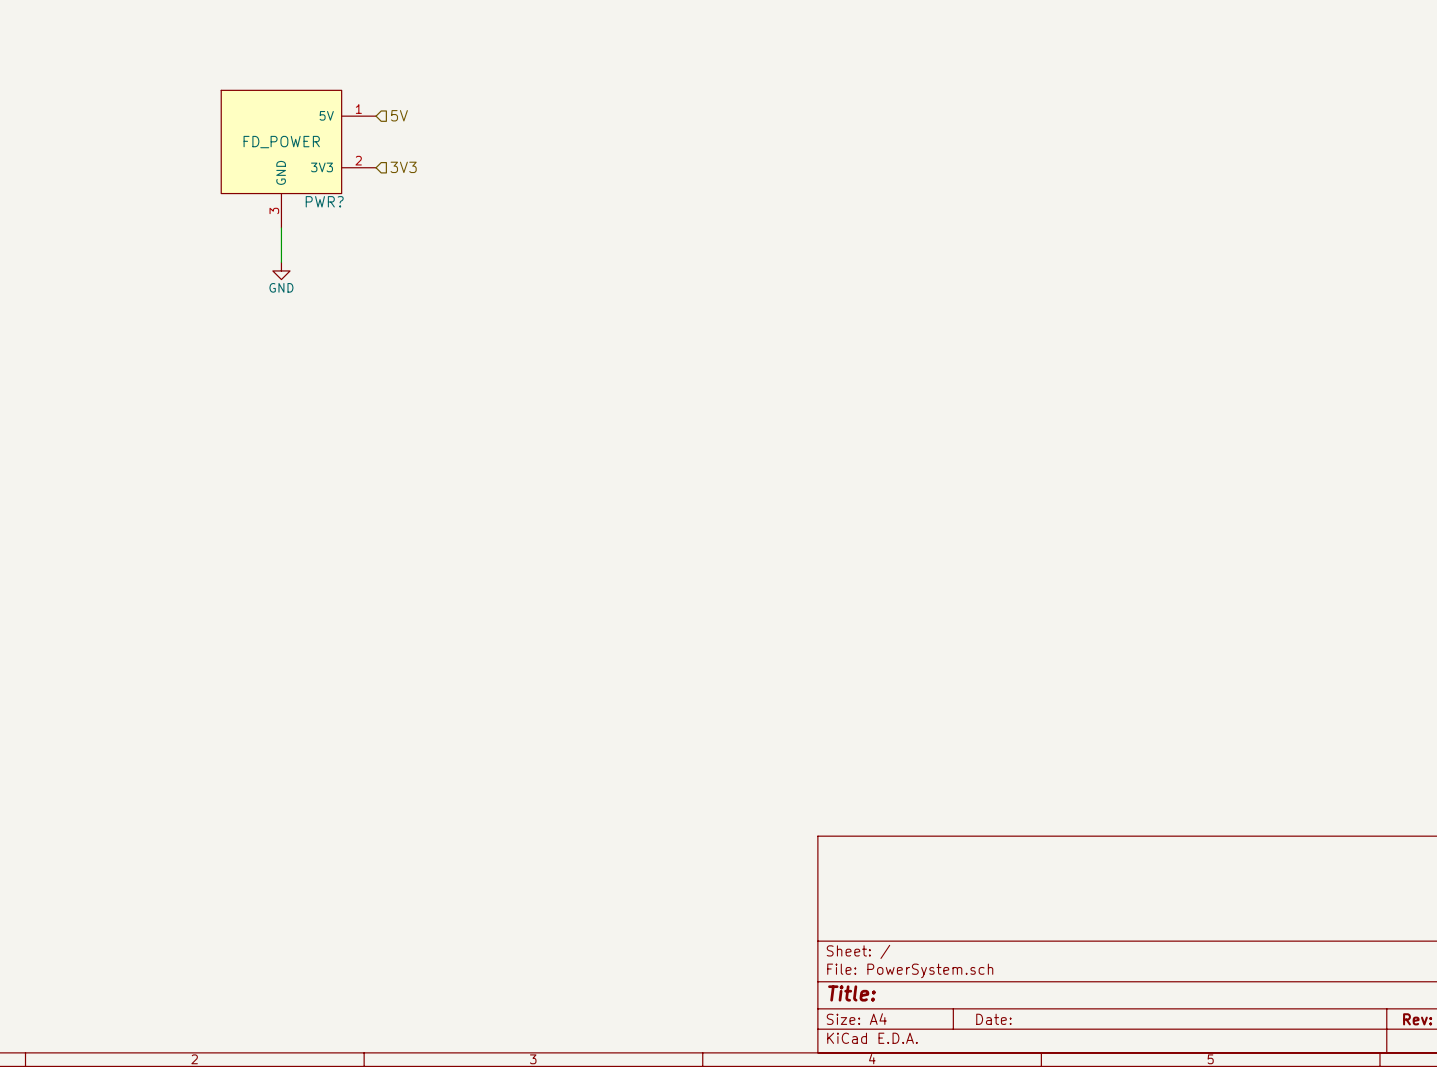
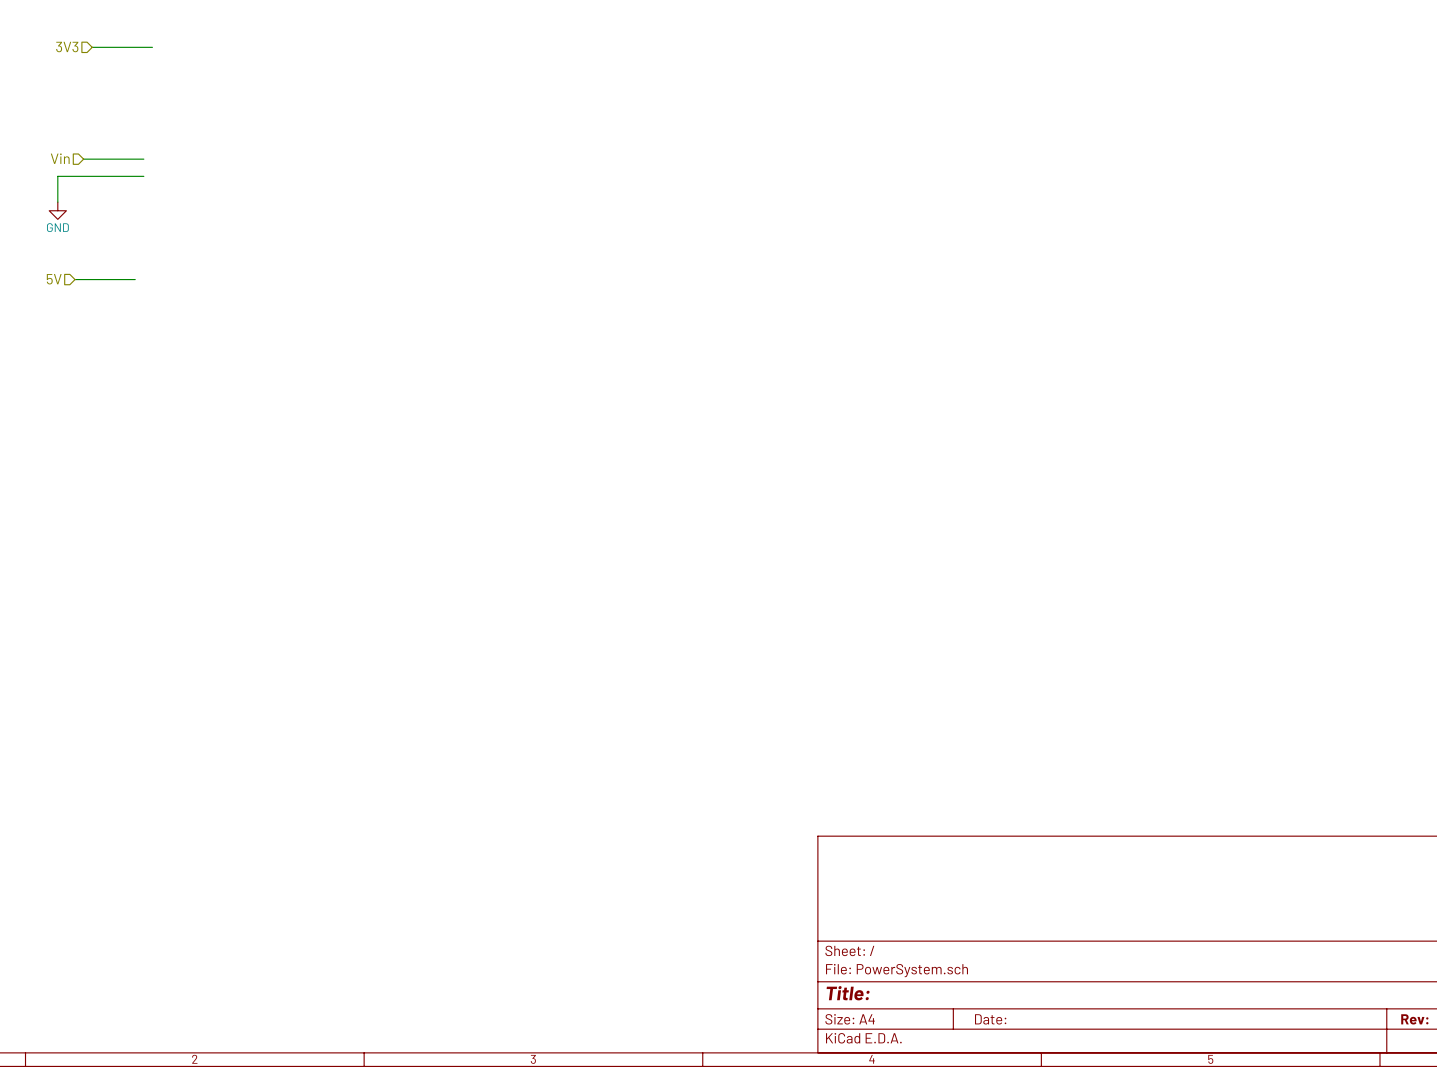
hierarchical label: none -> 3V3 (67, 47)
wire: none -> (92, 47) (152, 47)
hierarchical label: 5V (399, 115) -> none
hierarchical label: none -> Vin (60, 158)
wire: none -> (83, 159) (143, 159)
PWR?: FD_POWER (298, 159) -> none
hierarchical label: 3V3 (403, 167) -> none
wire: none -> (143, 176) (57, 176) (57, 202)
power symbol: none -> GND (57, 210)
wire: (281, 227) (281, 262) -> none
power symbol: GND (281, 270) -> none
hierarchical label: none -> 5V (54, 279)
wire: none -> (75, 279) (135, 279)

